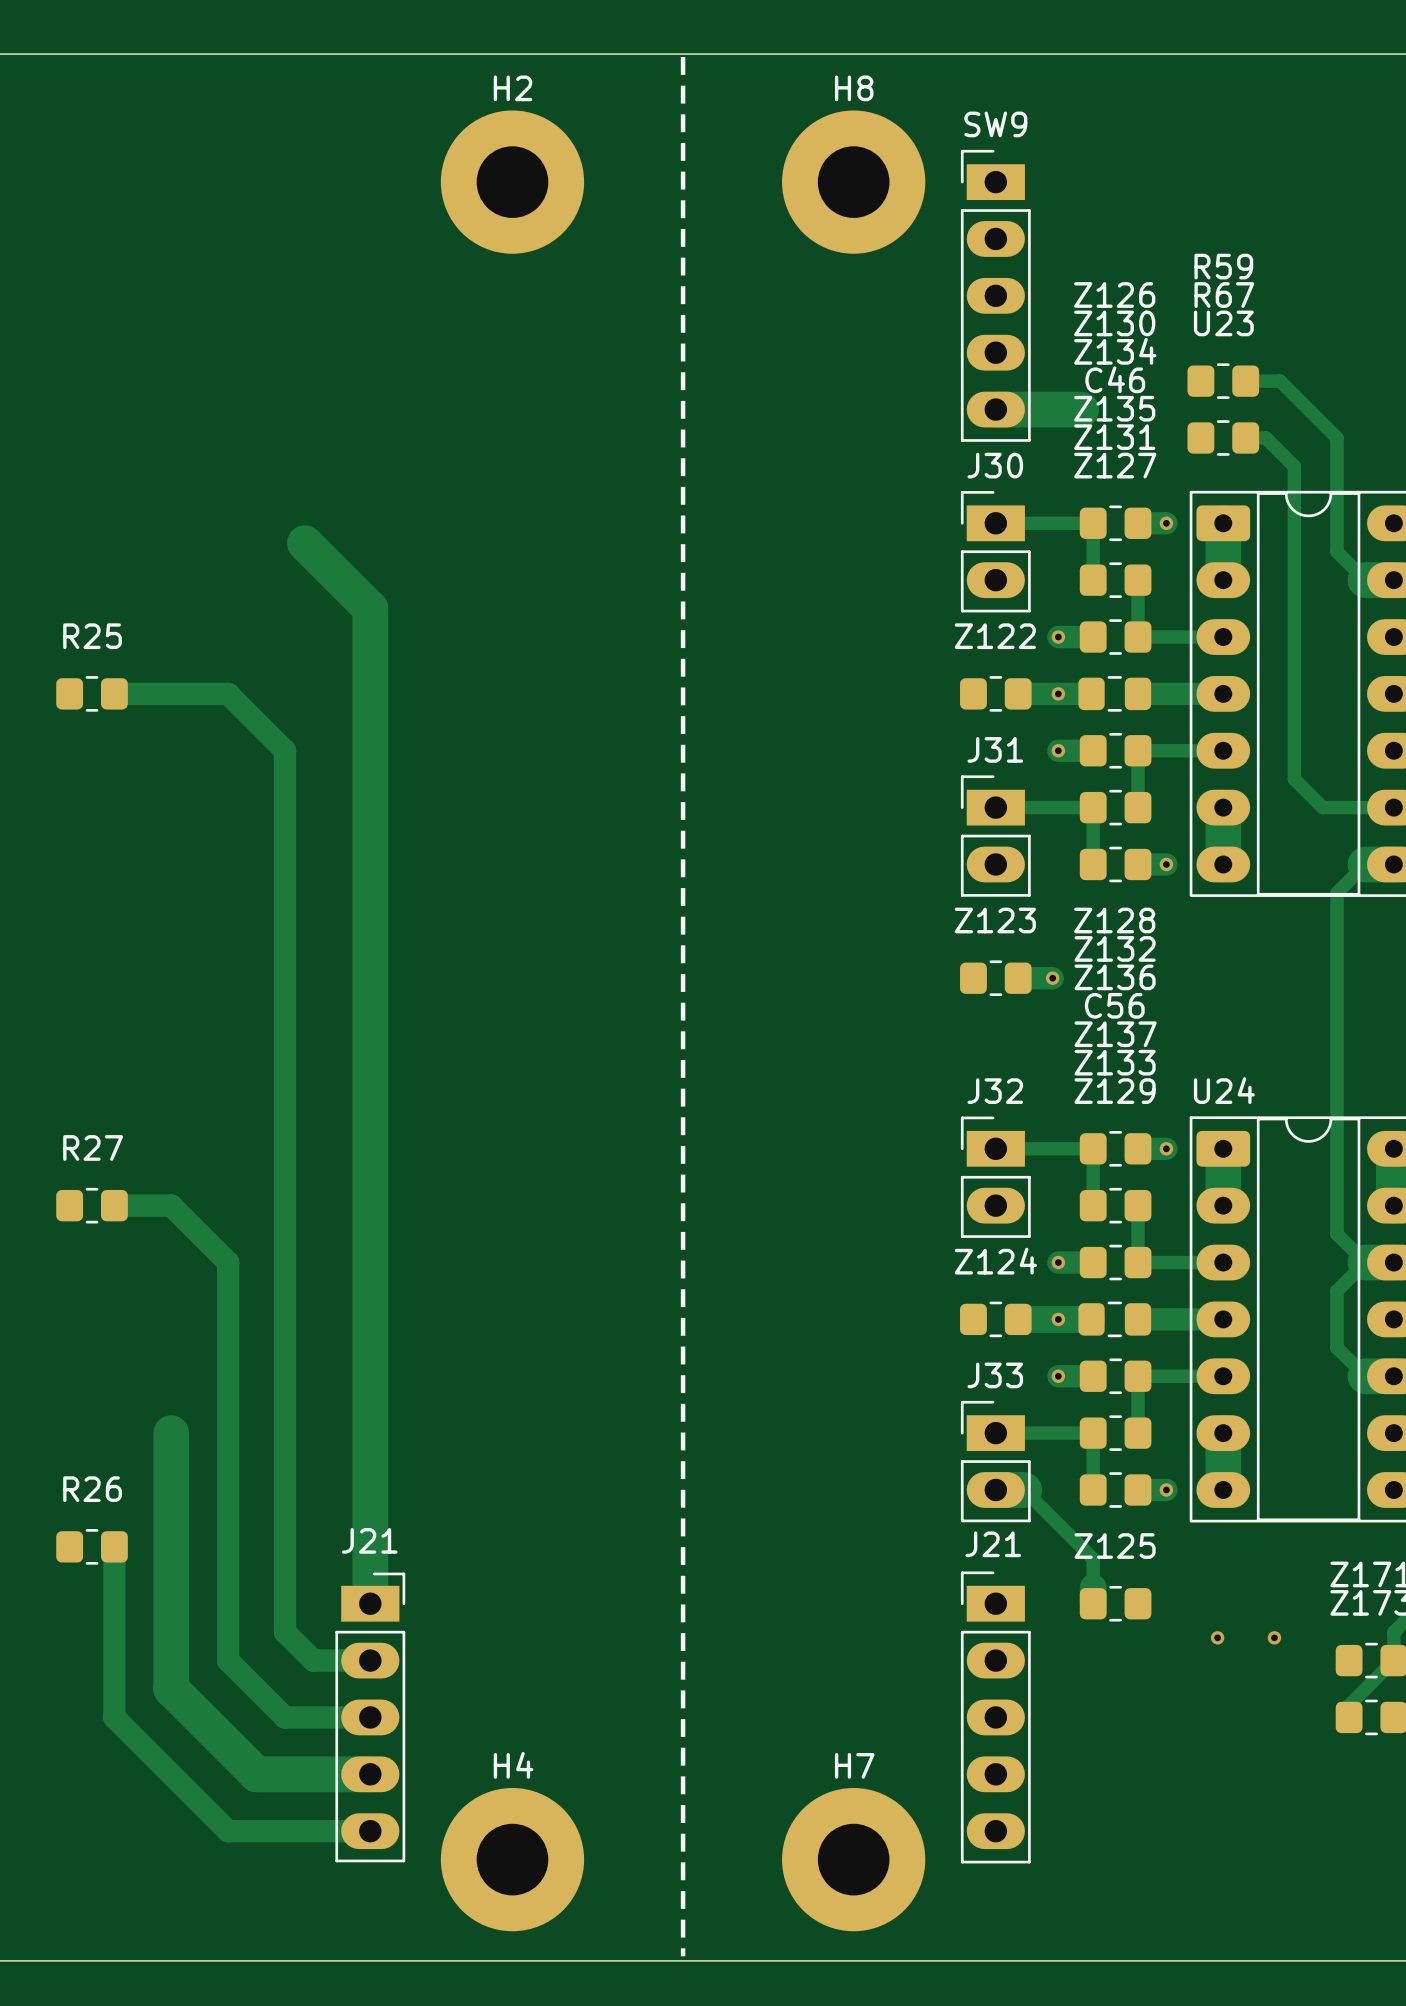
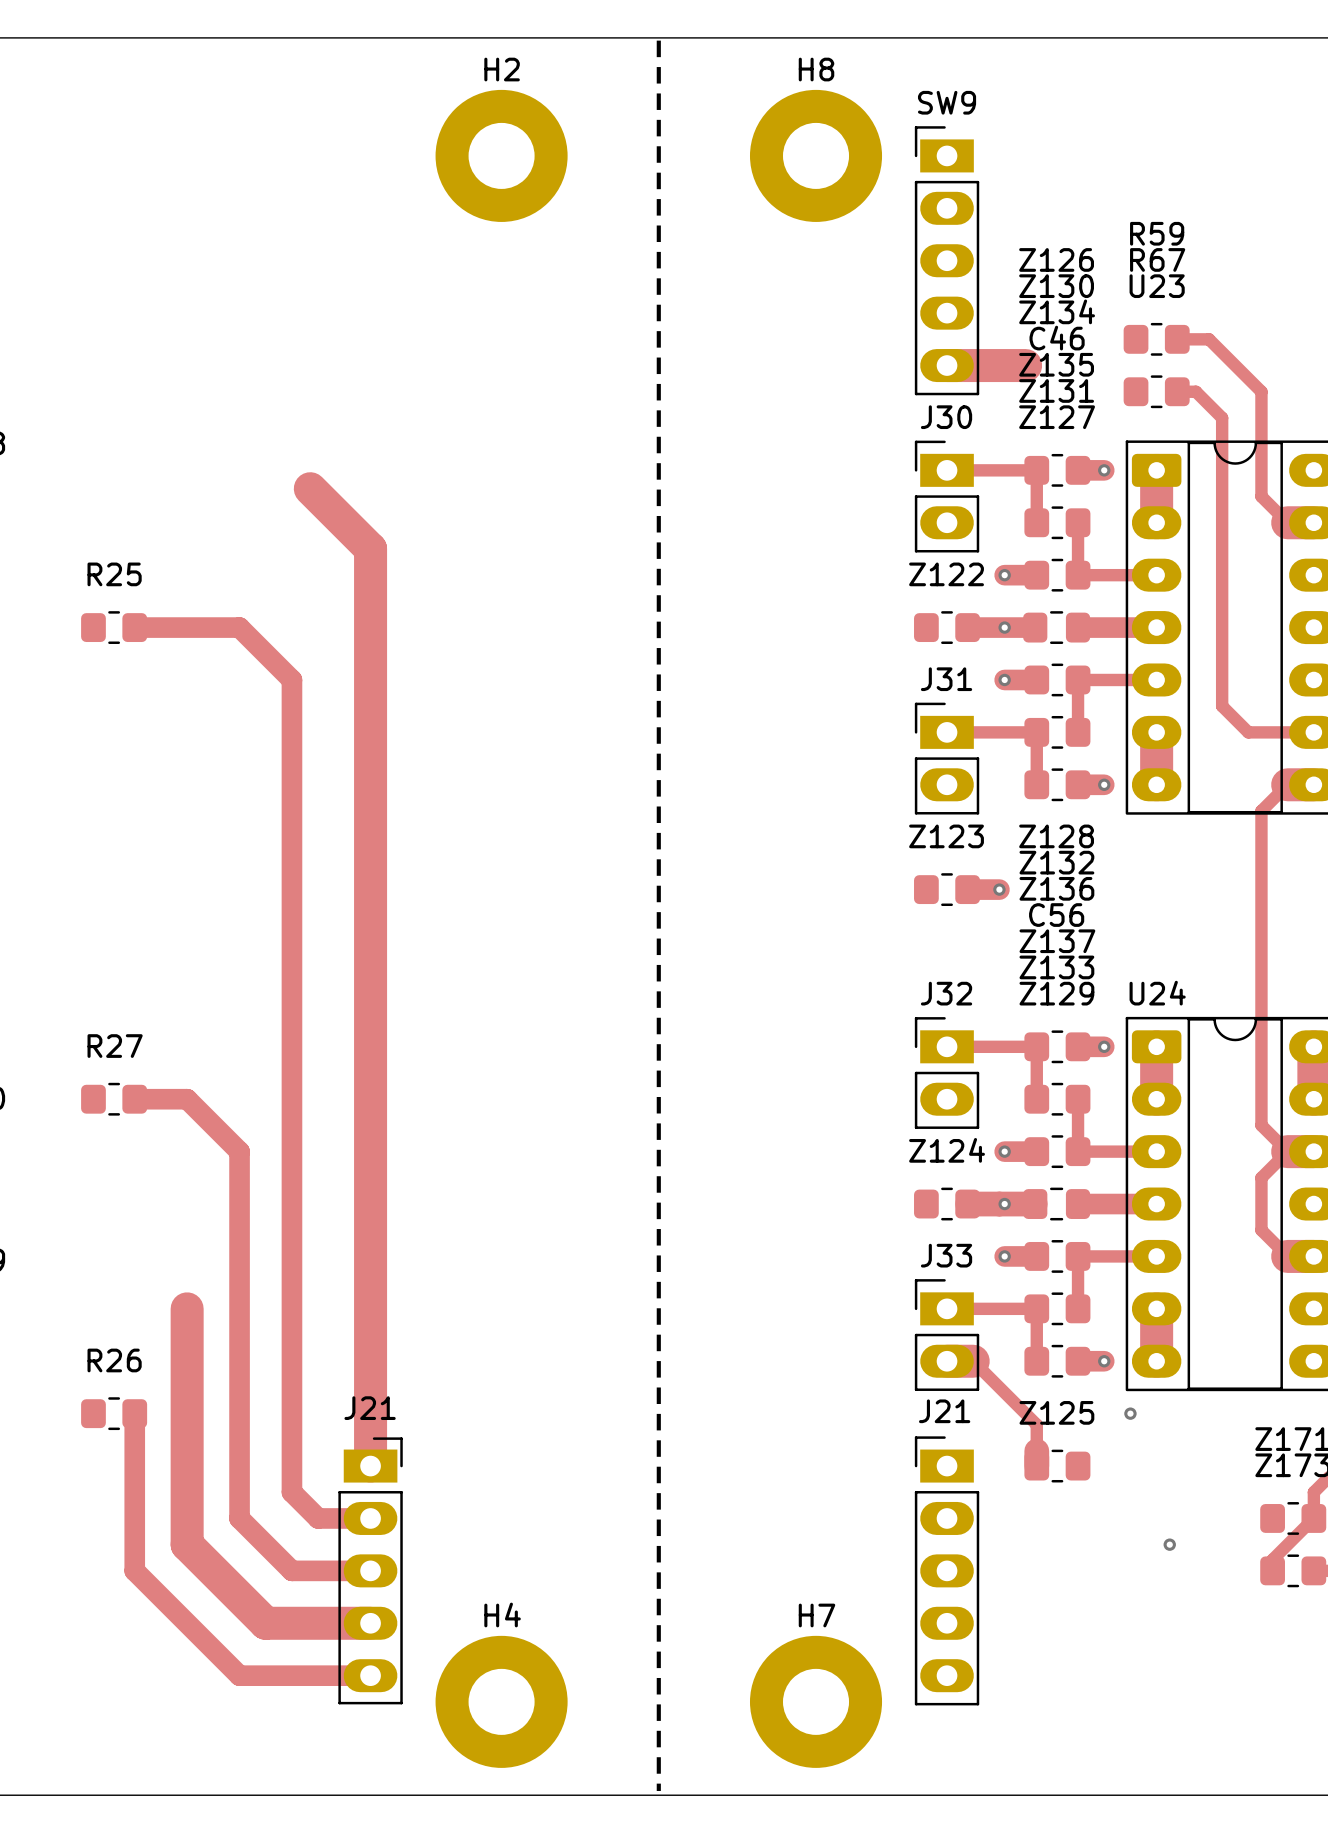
via: none -> (1130, 1413)
via: (1217, 1637) -> none
via: (1274, 1637) -> none
via: none -> (1169, 1544)

